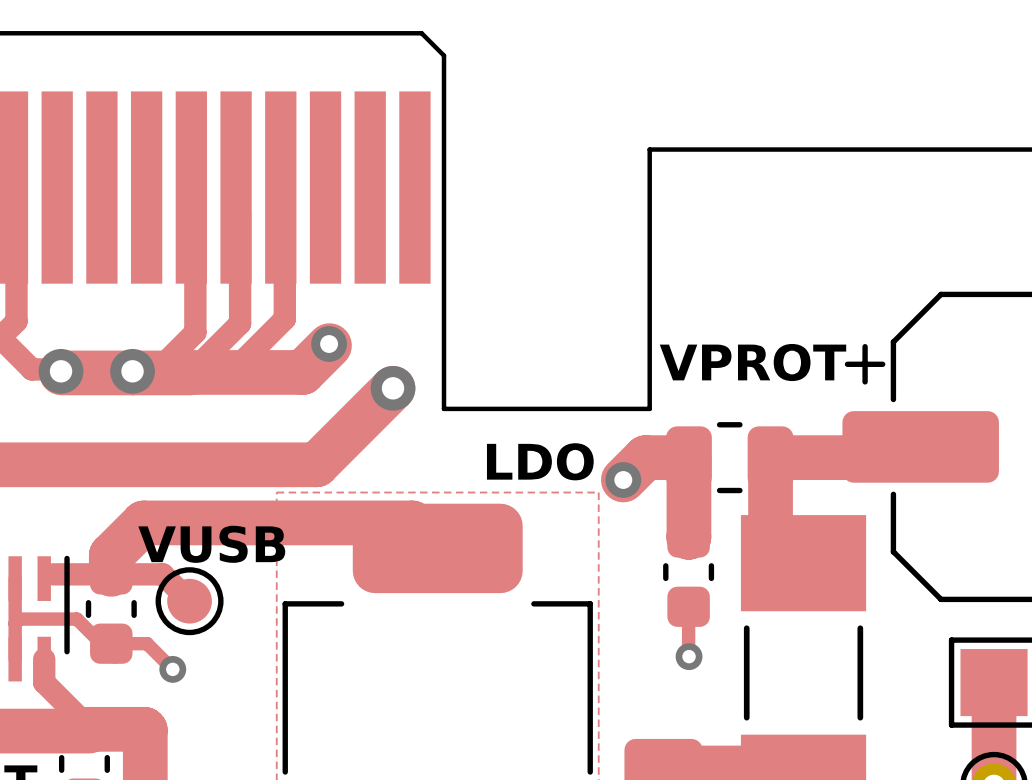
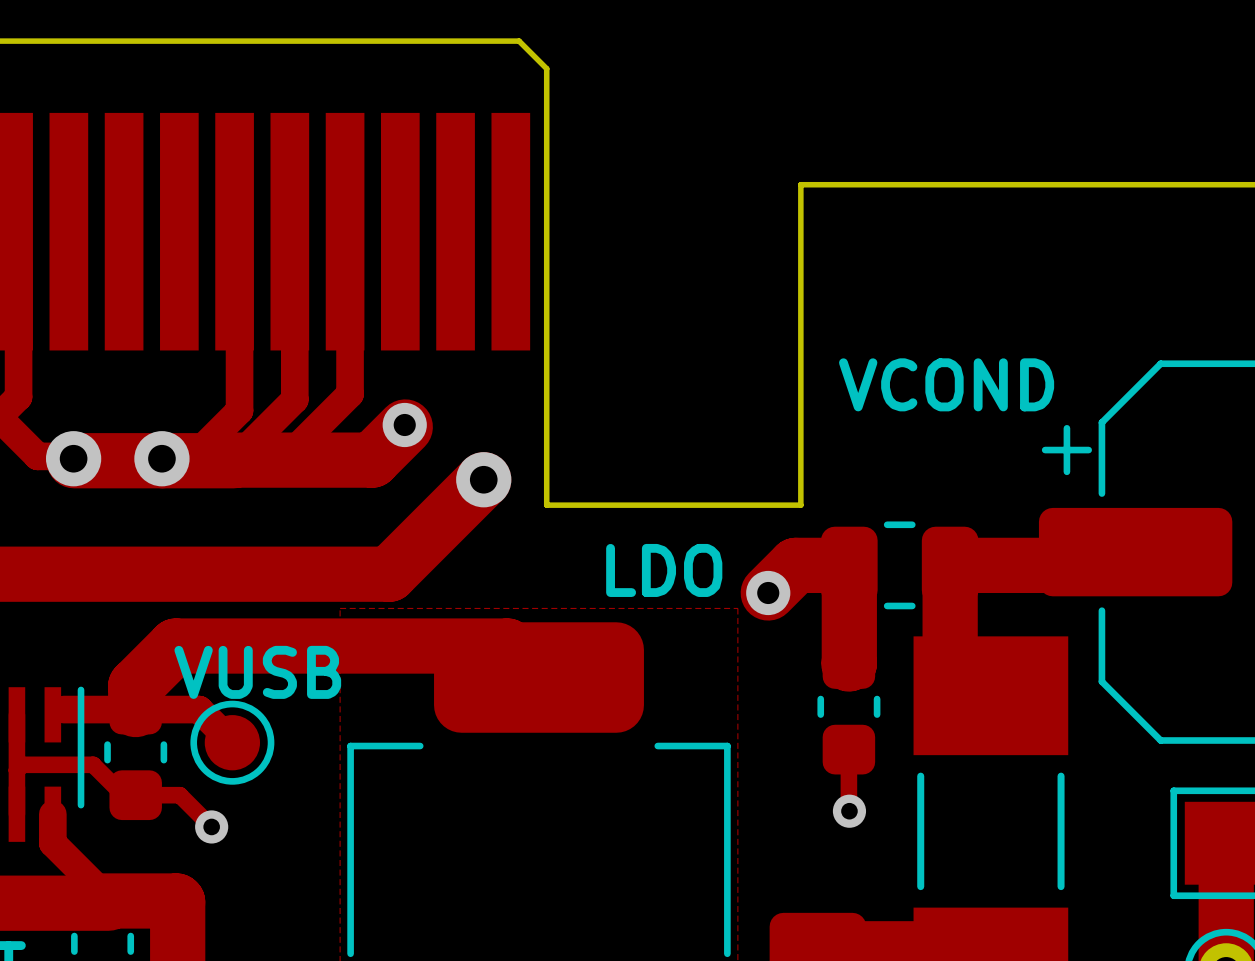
text: none -> VCOND (946, 384)
text: VPROT (752, 362) -> none

